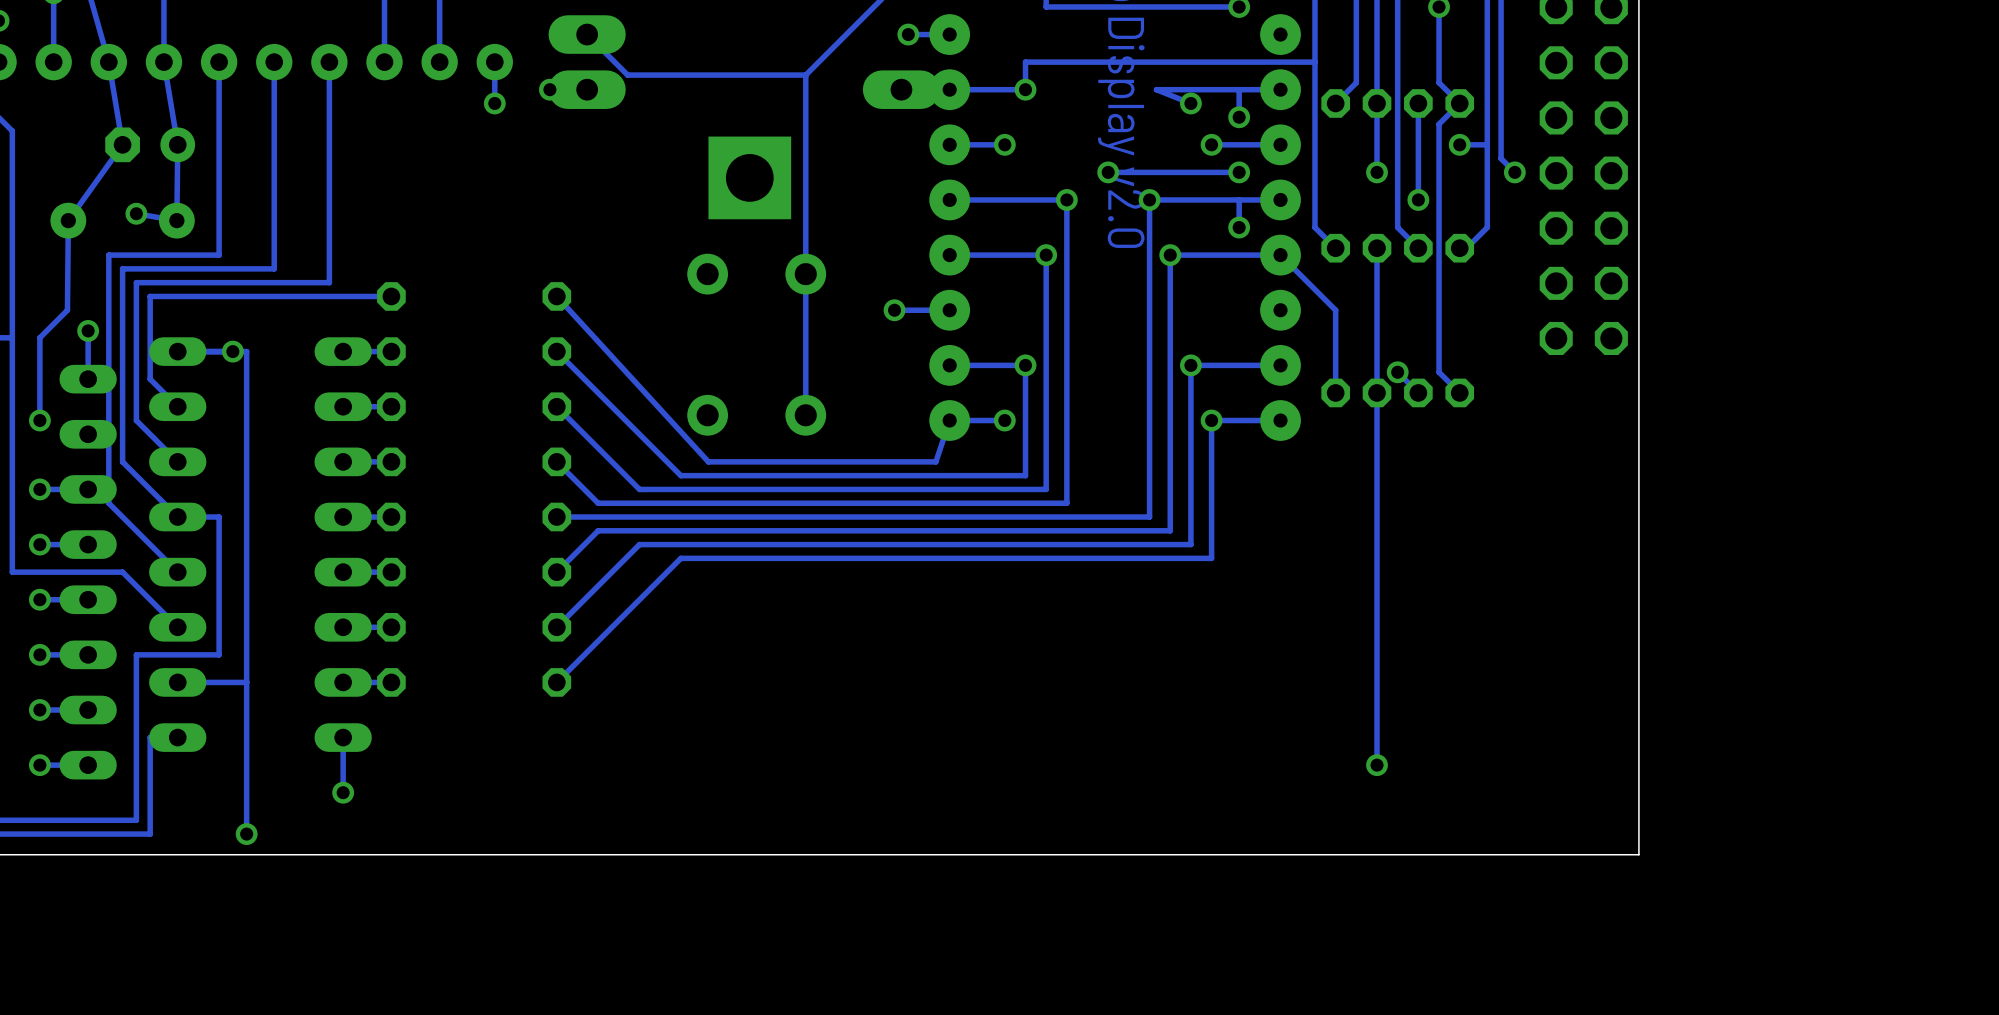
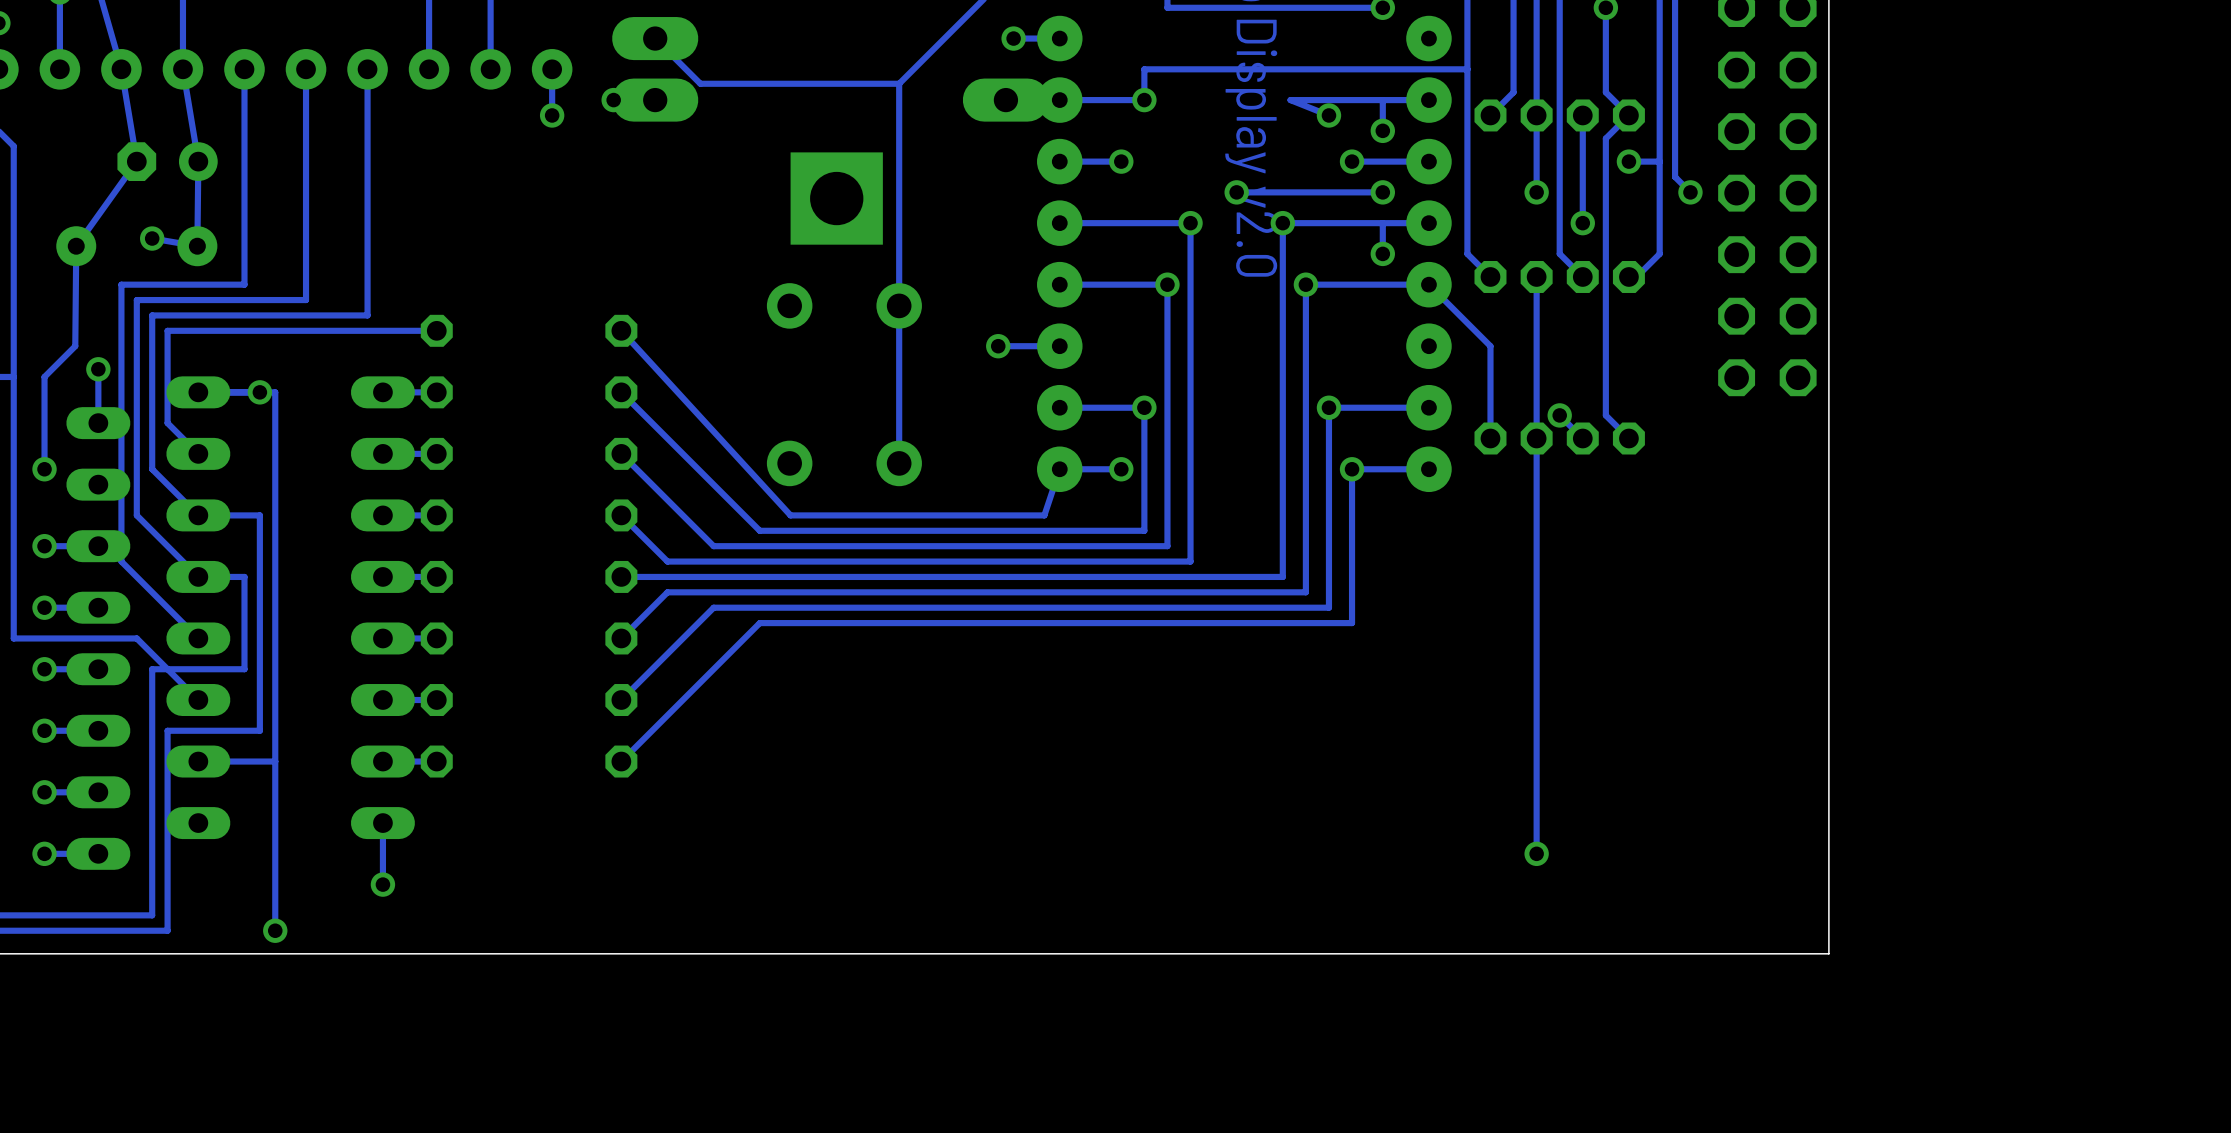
track: none -> (198, 515) (259, 515) (259, 730) (244, 730)
track: (219, 599) (219, 654) -> (244, 669) (152, 669) (152, 730)
track: (150, 654) (136, 654) -> (167, 730) (167, 823)

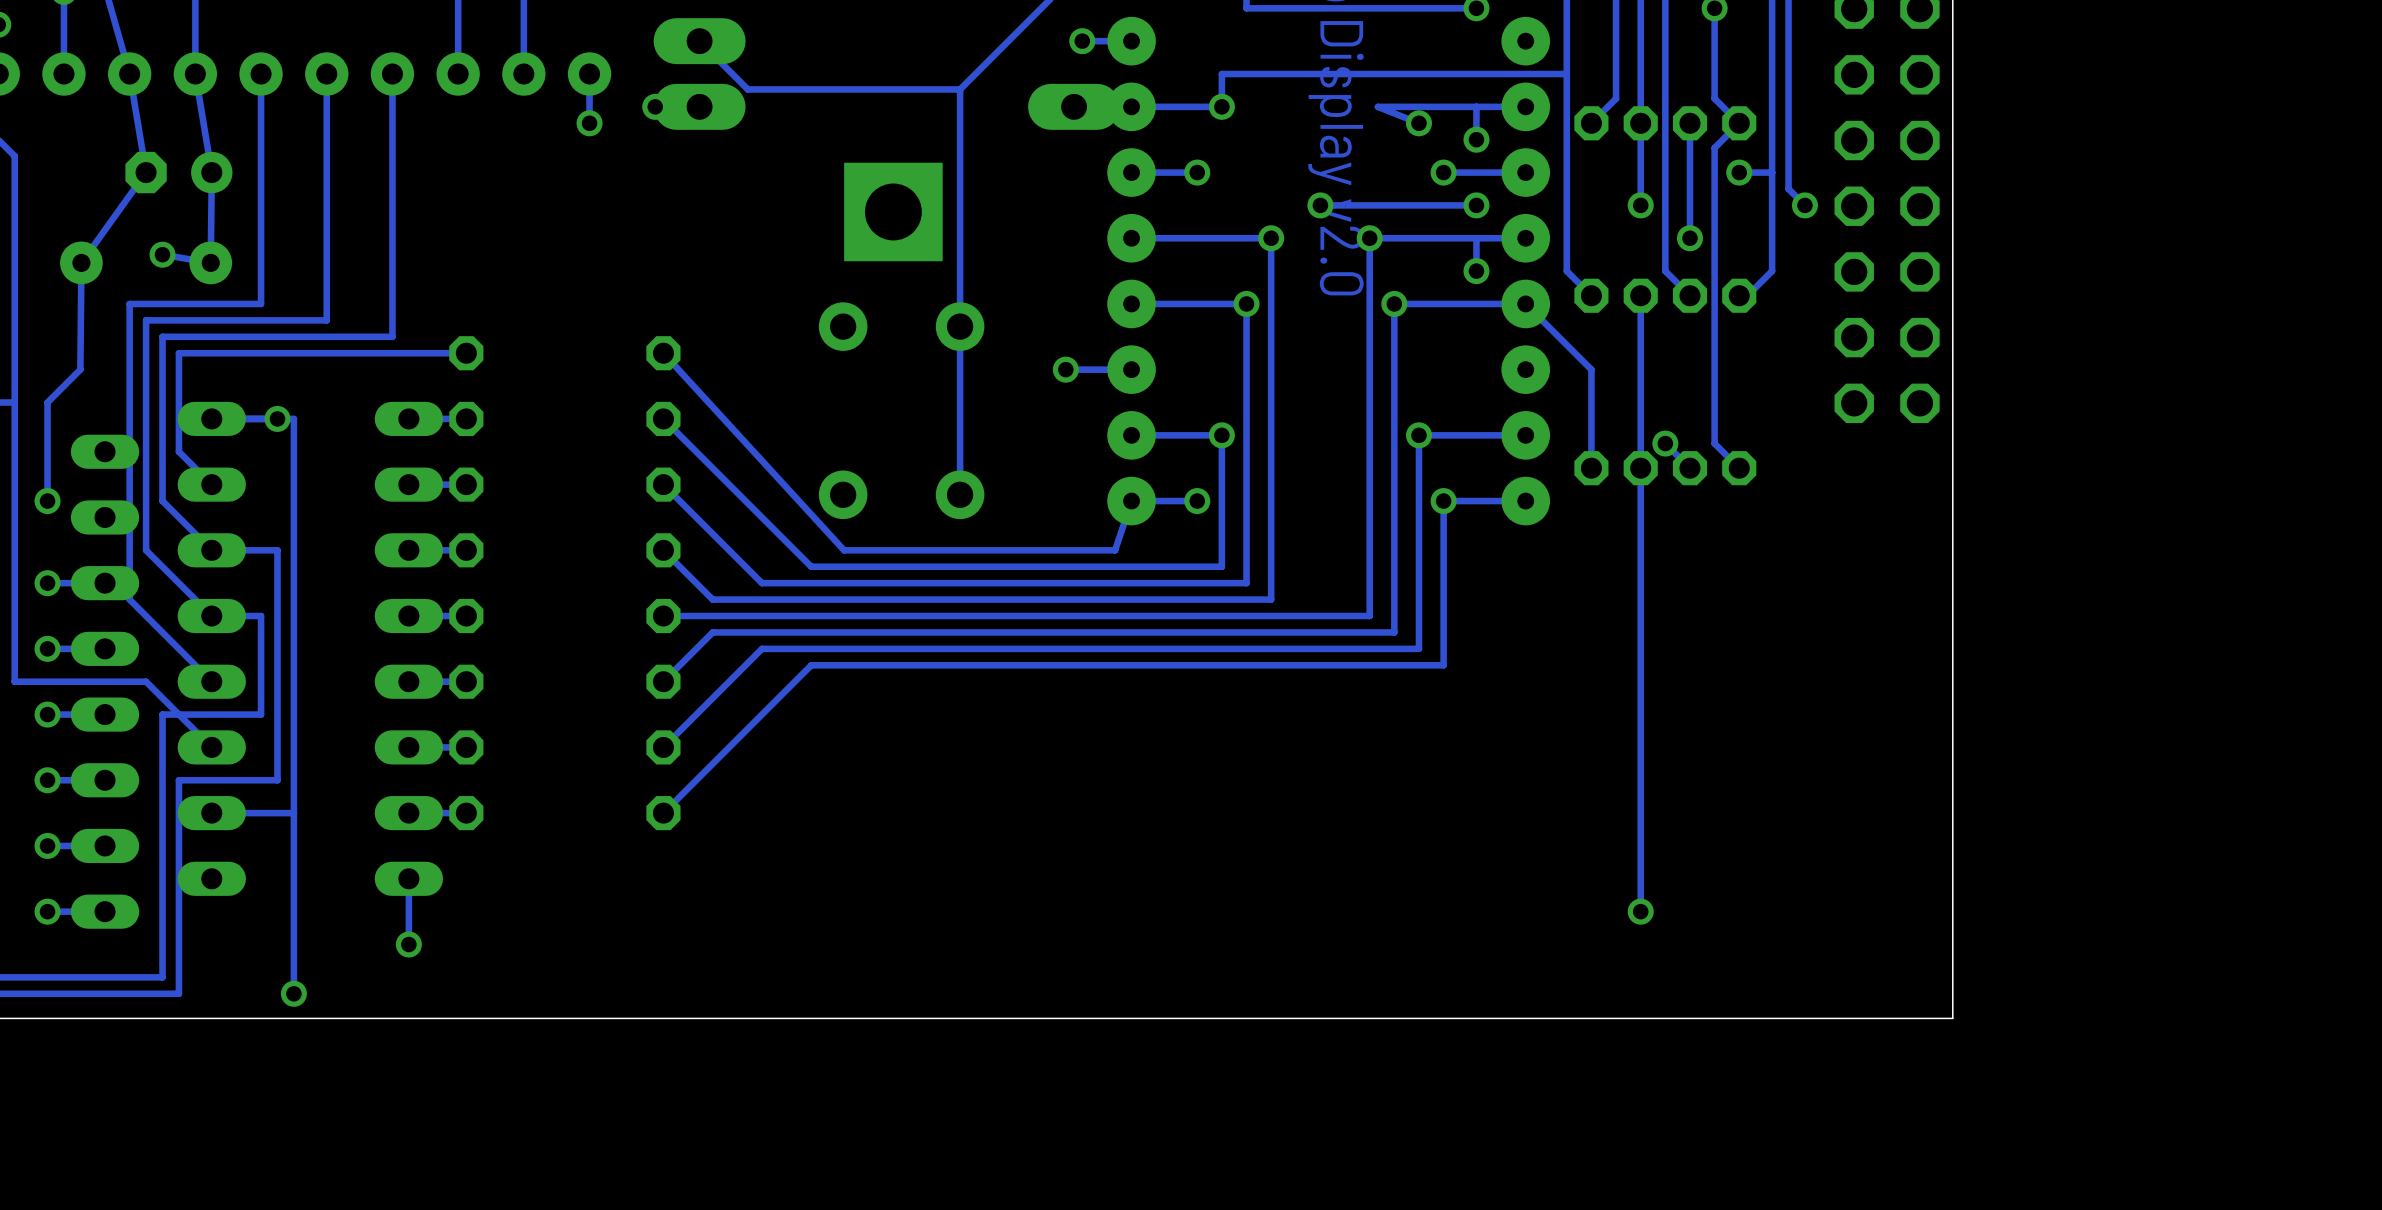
track: (98, 369) (98, 423) -> none
via: (98, 369) -> none

